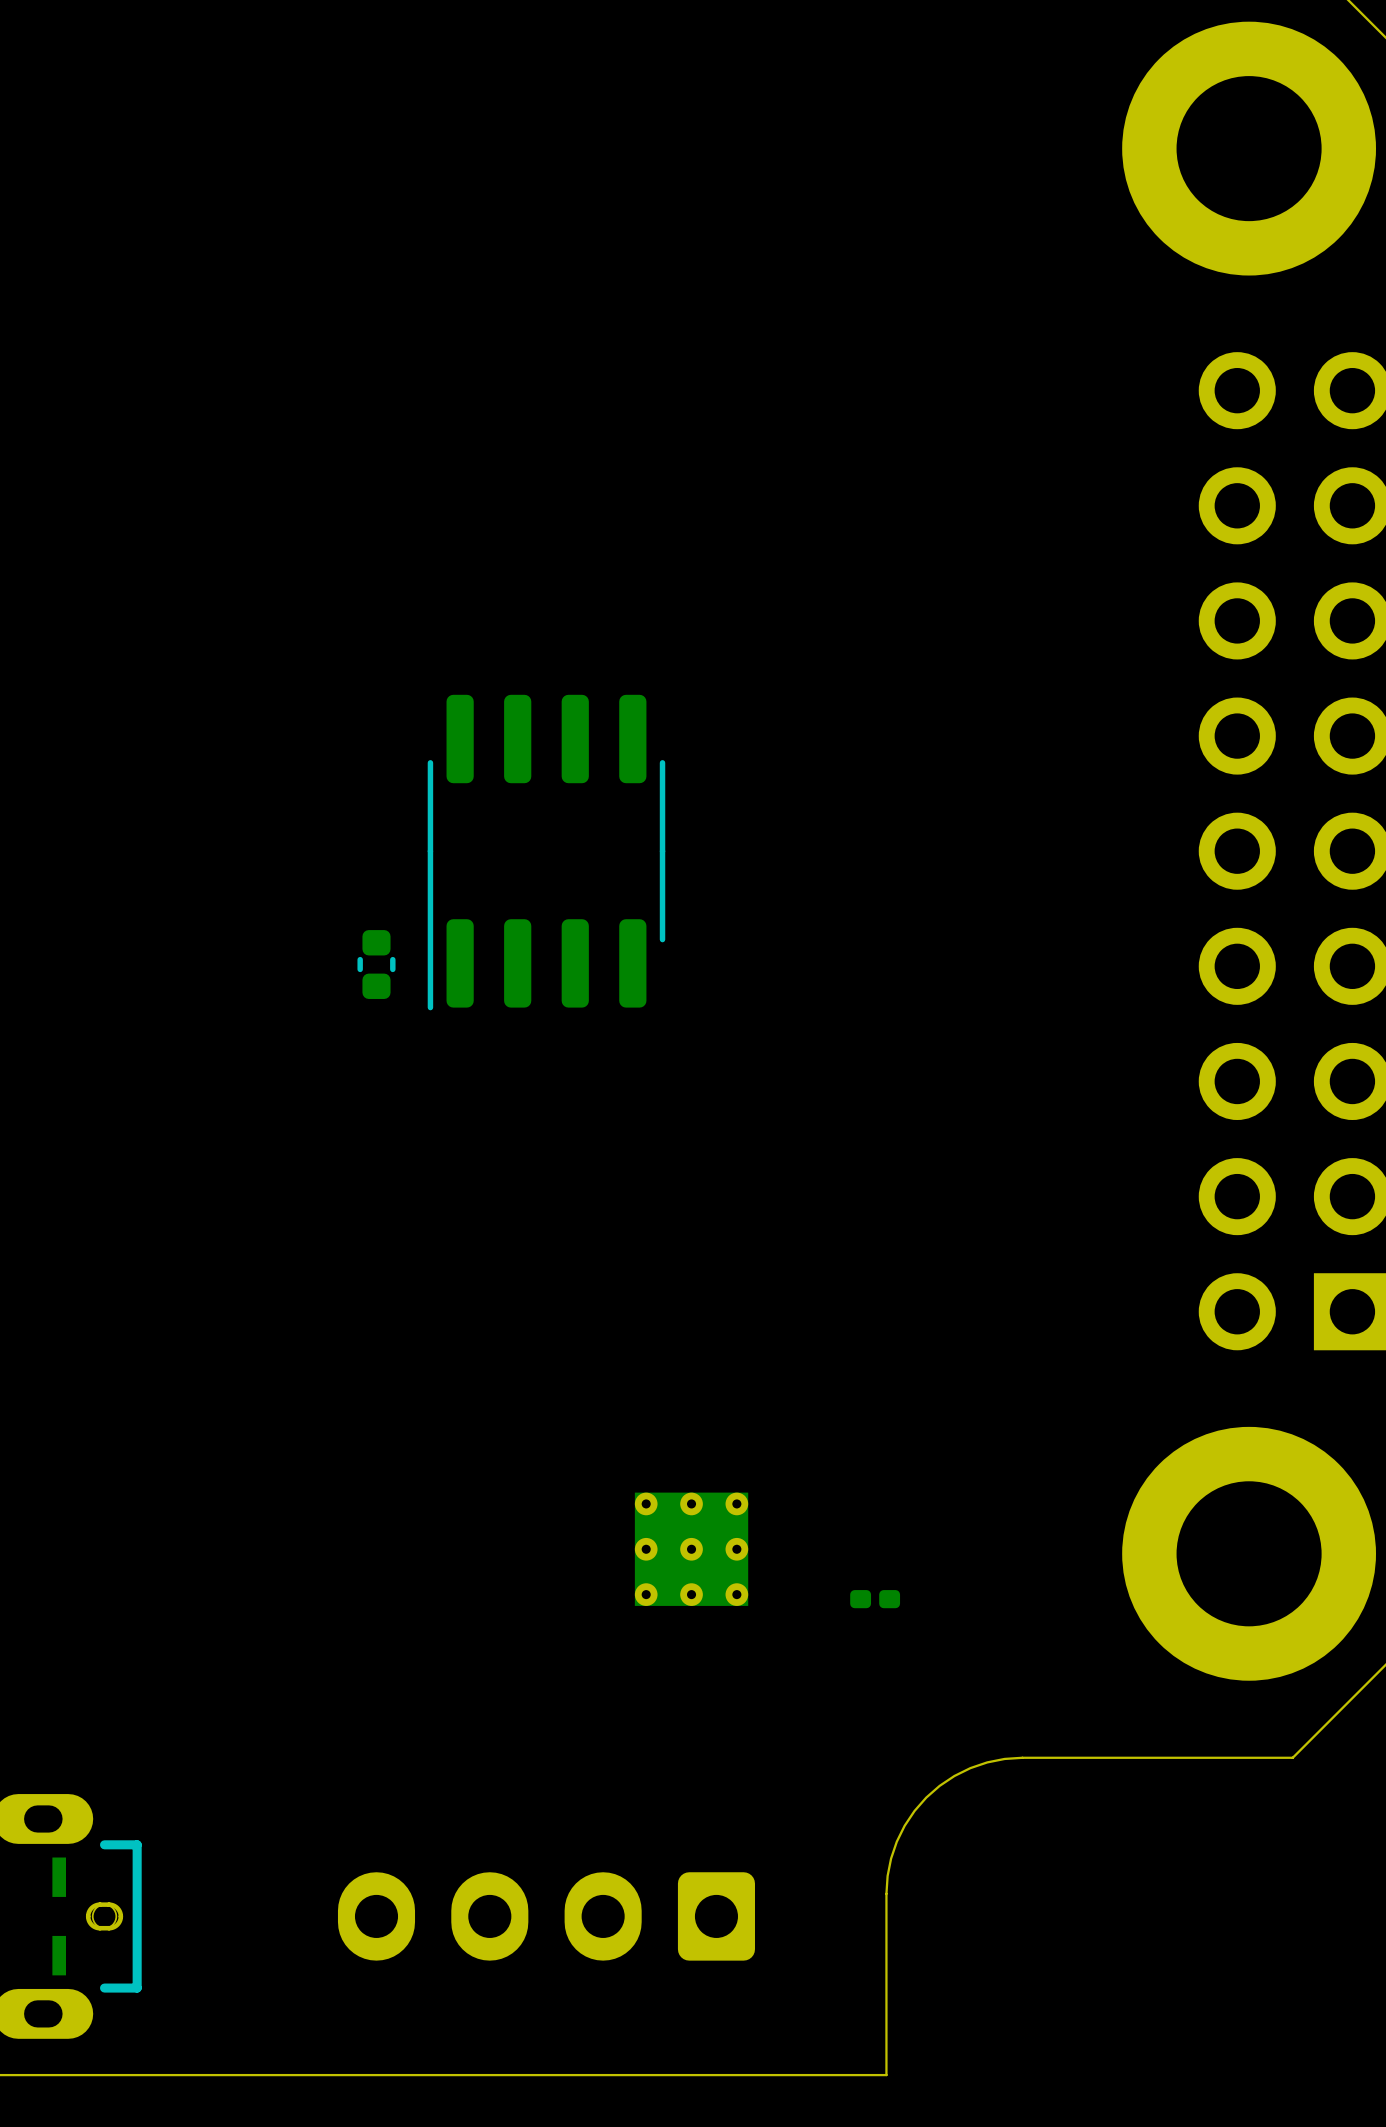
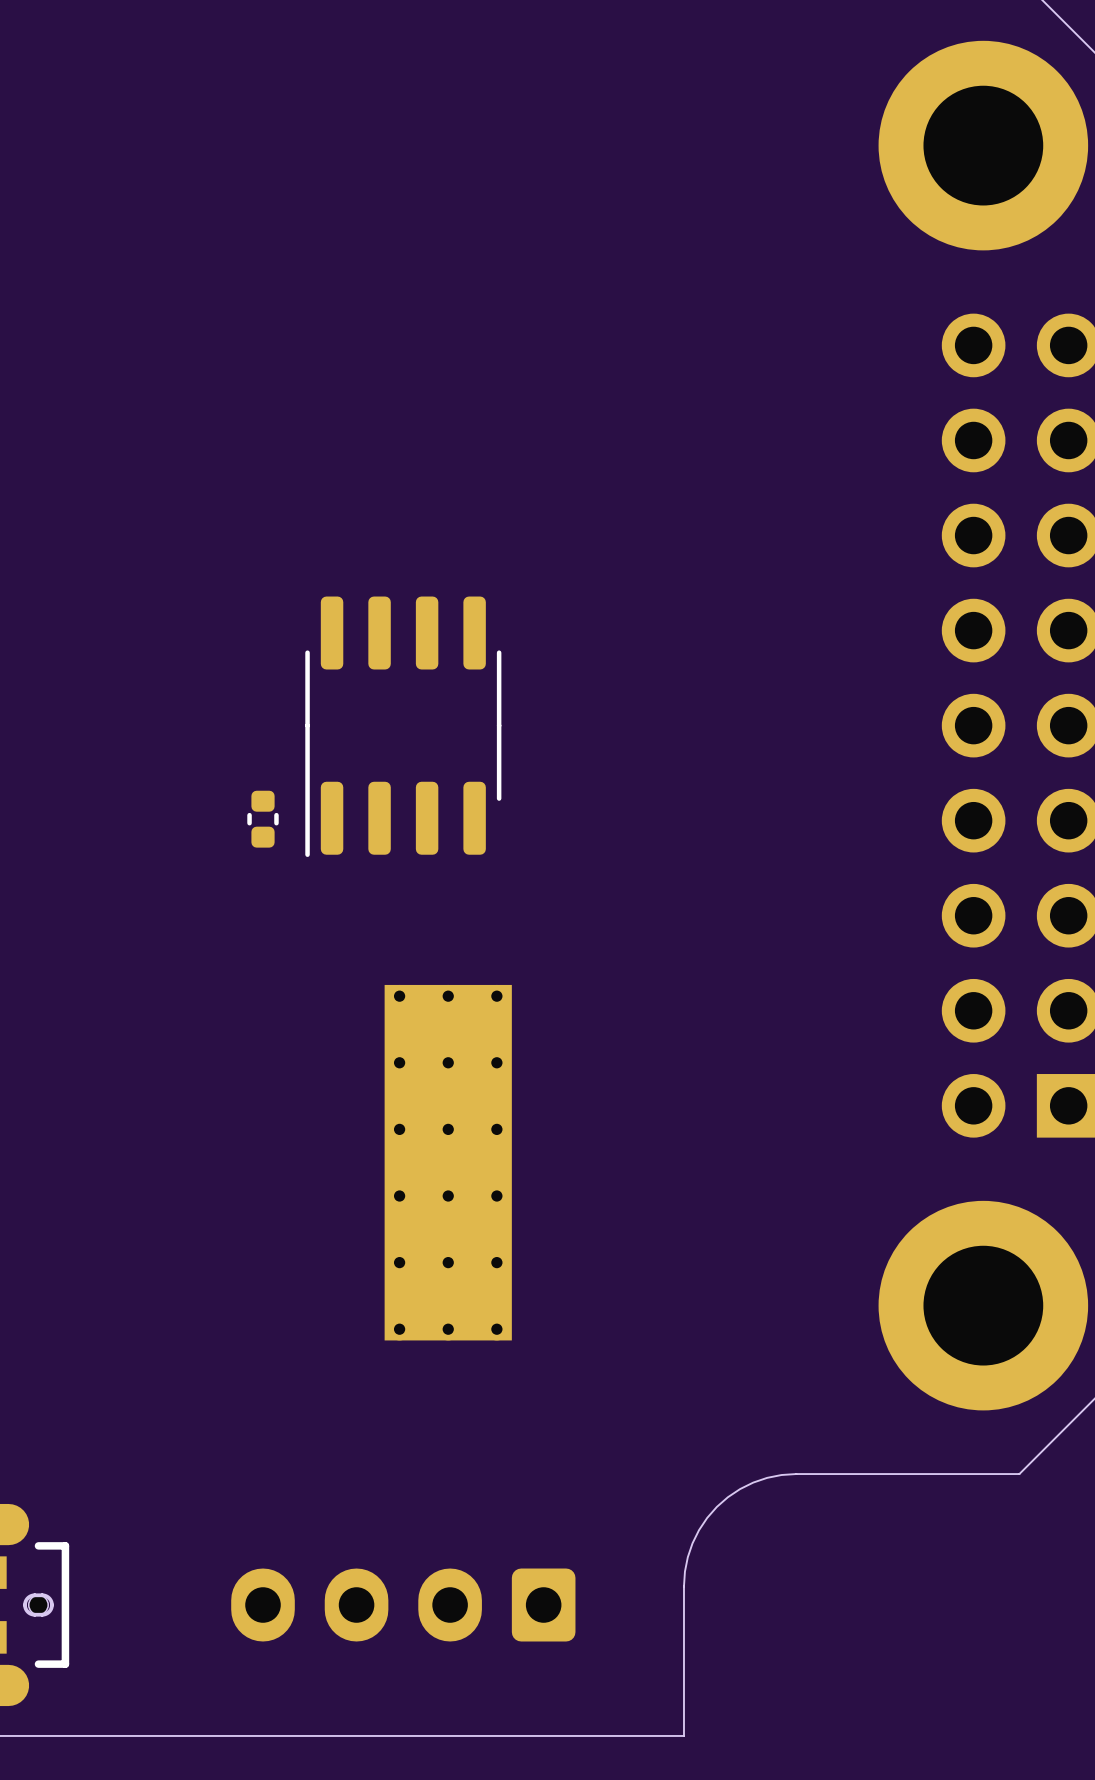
part: none -> (448, 1162)
part: (691, 1549) -> none
part: (875, 1599) -> none

